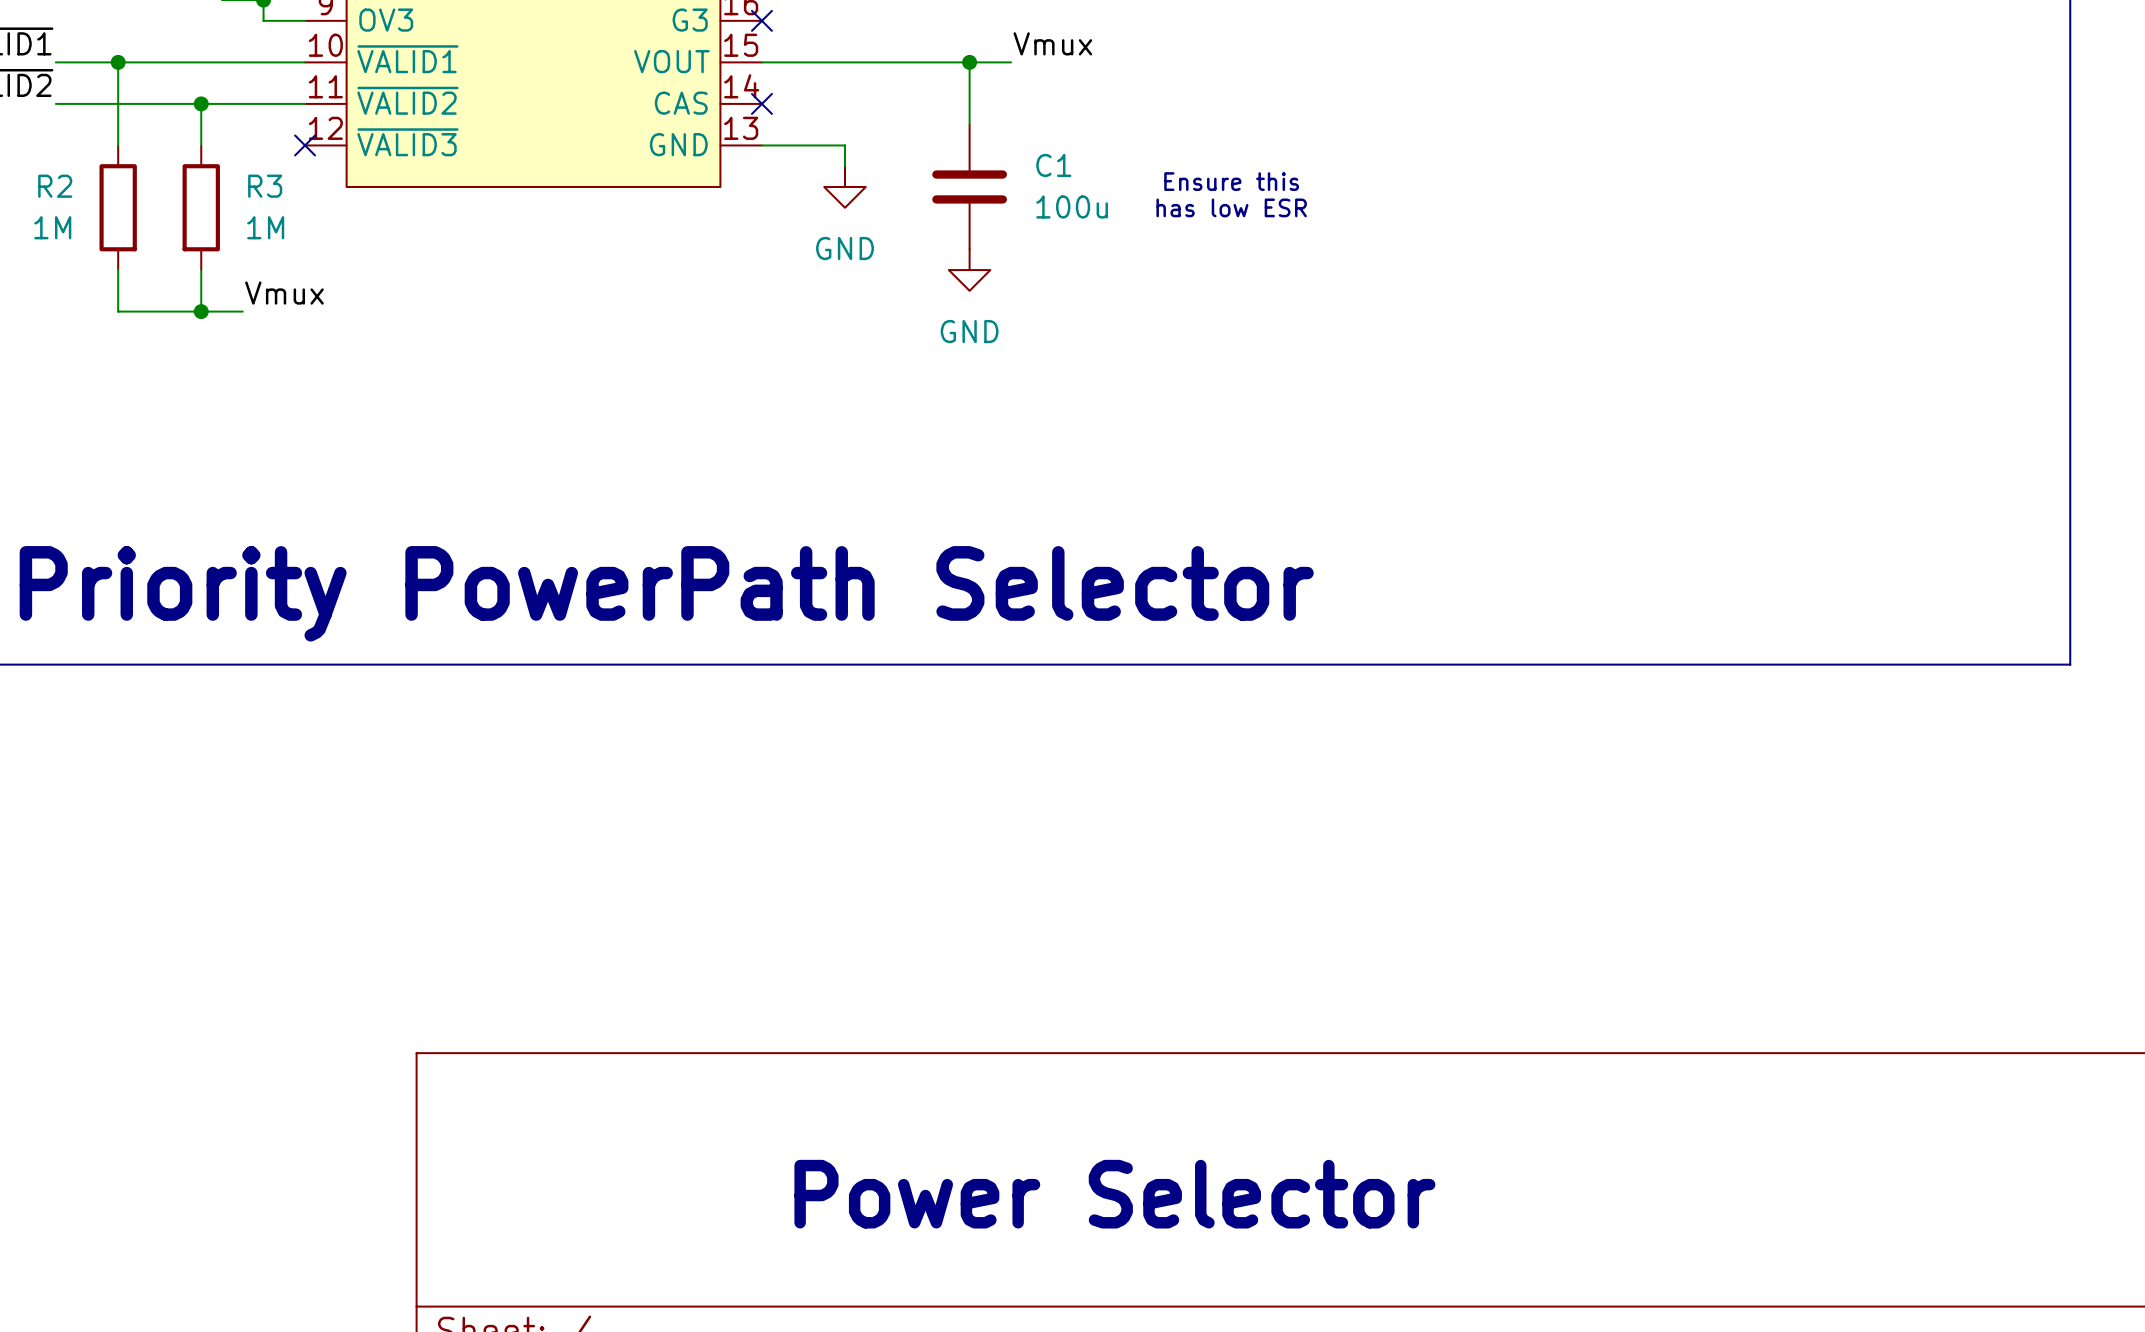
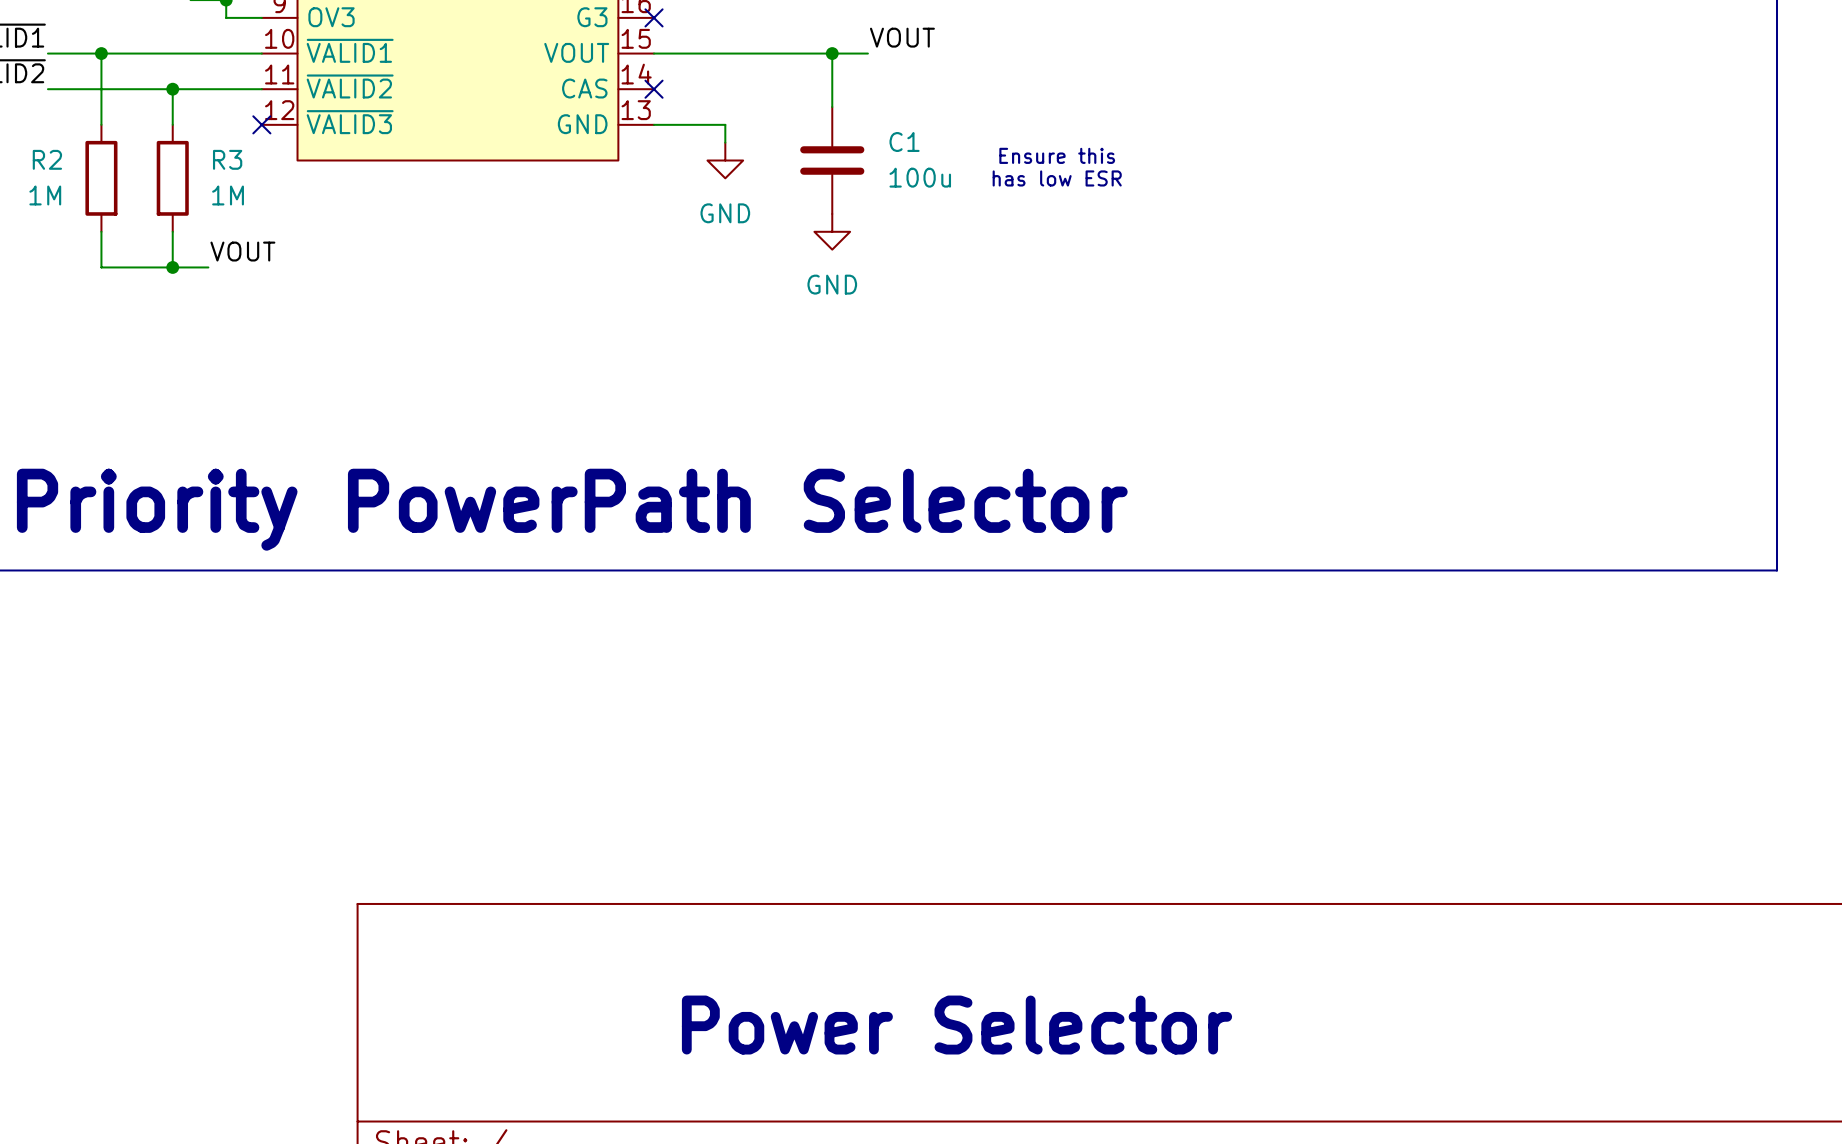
label: Vmux (1052, 43) -> VOUT (902, 37)
label: Vmux (284, 293) -> VOUT (242, 251)

